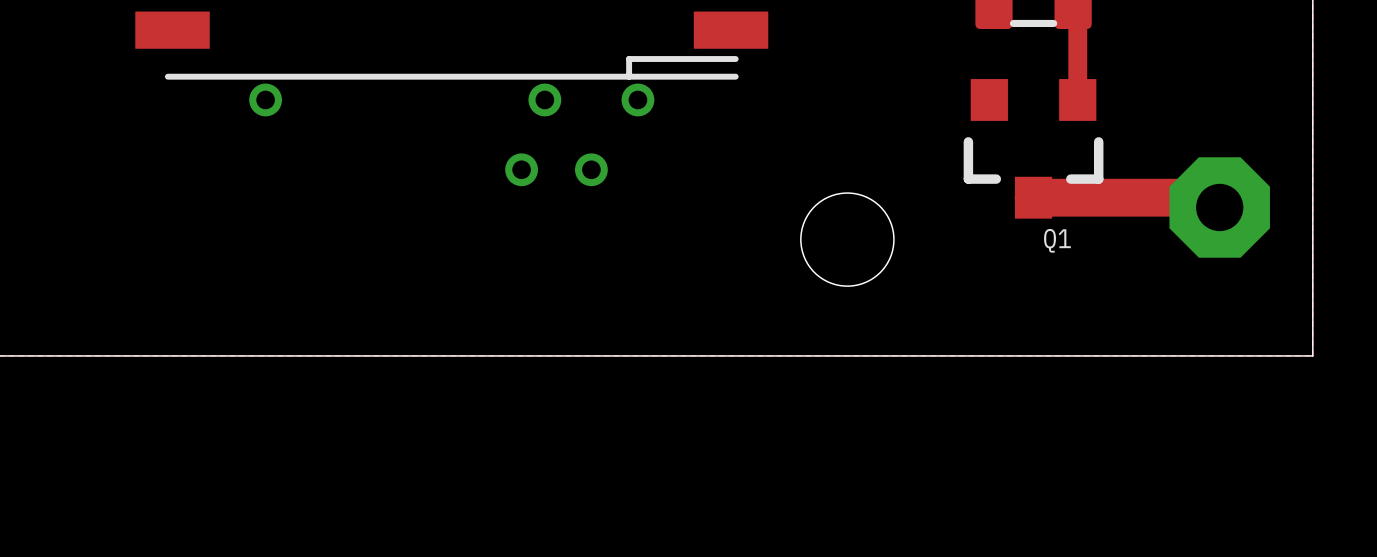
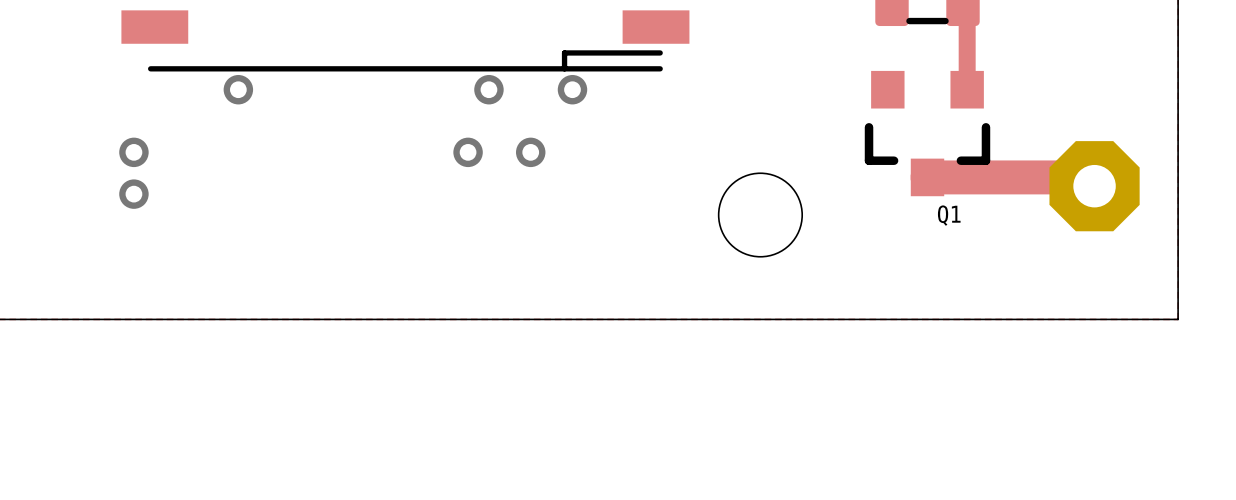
via: none -> (133, 152)
via: none -> (133, 194)

